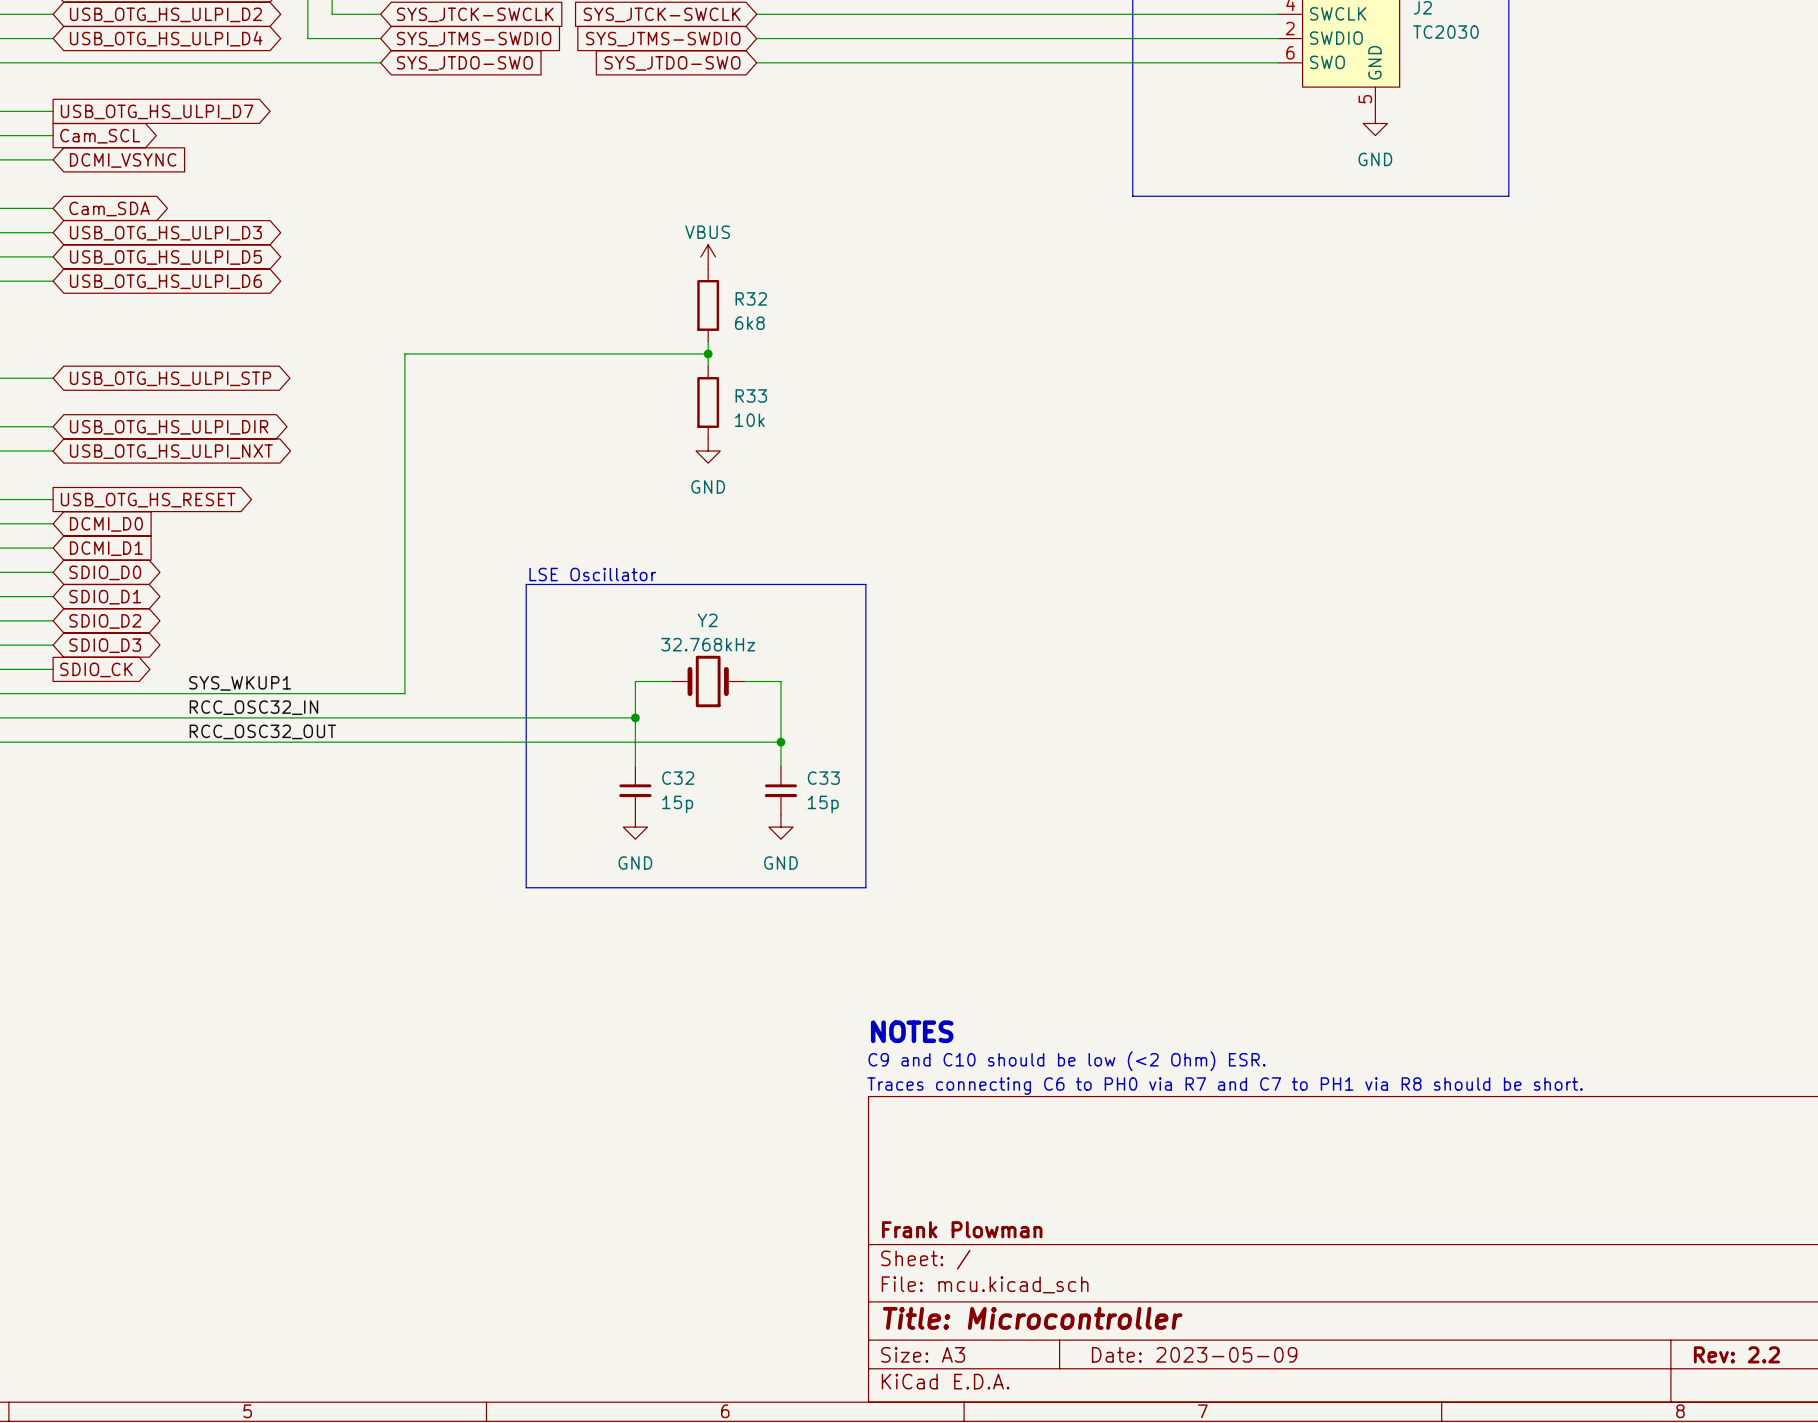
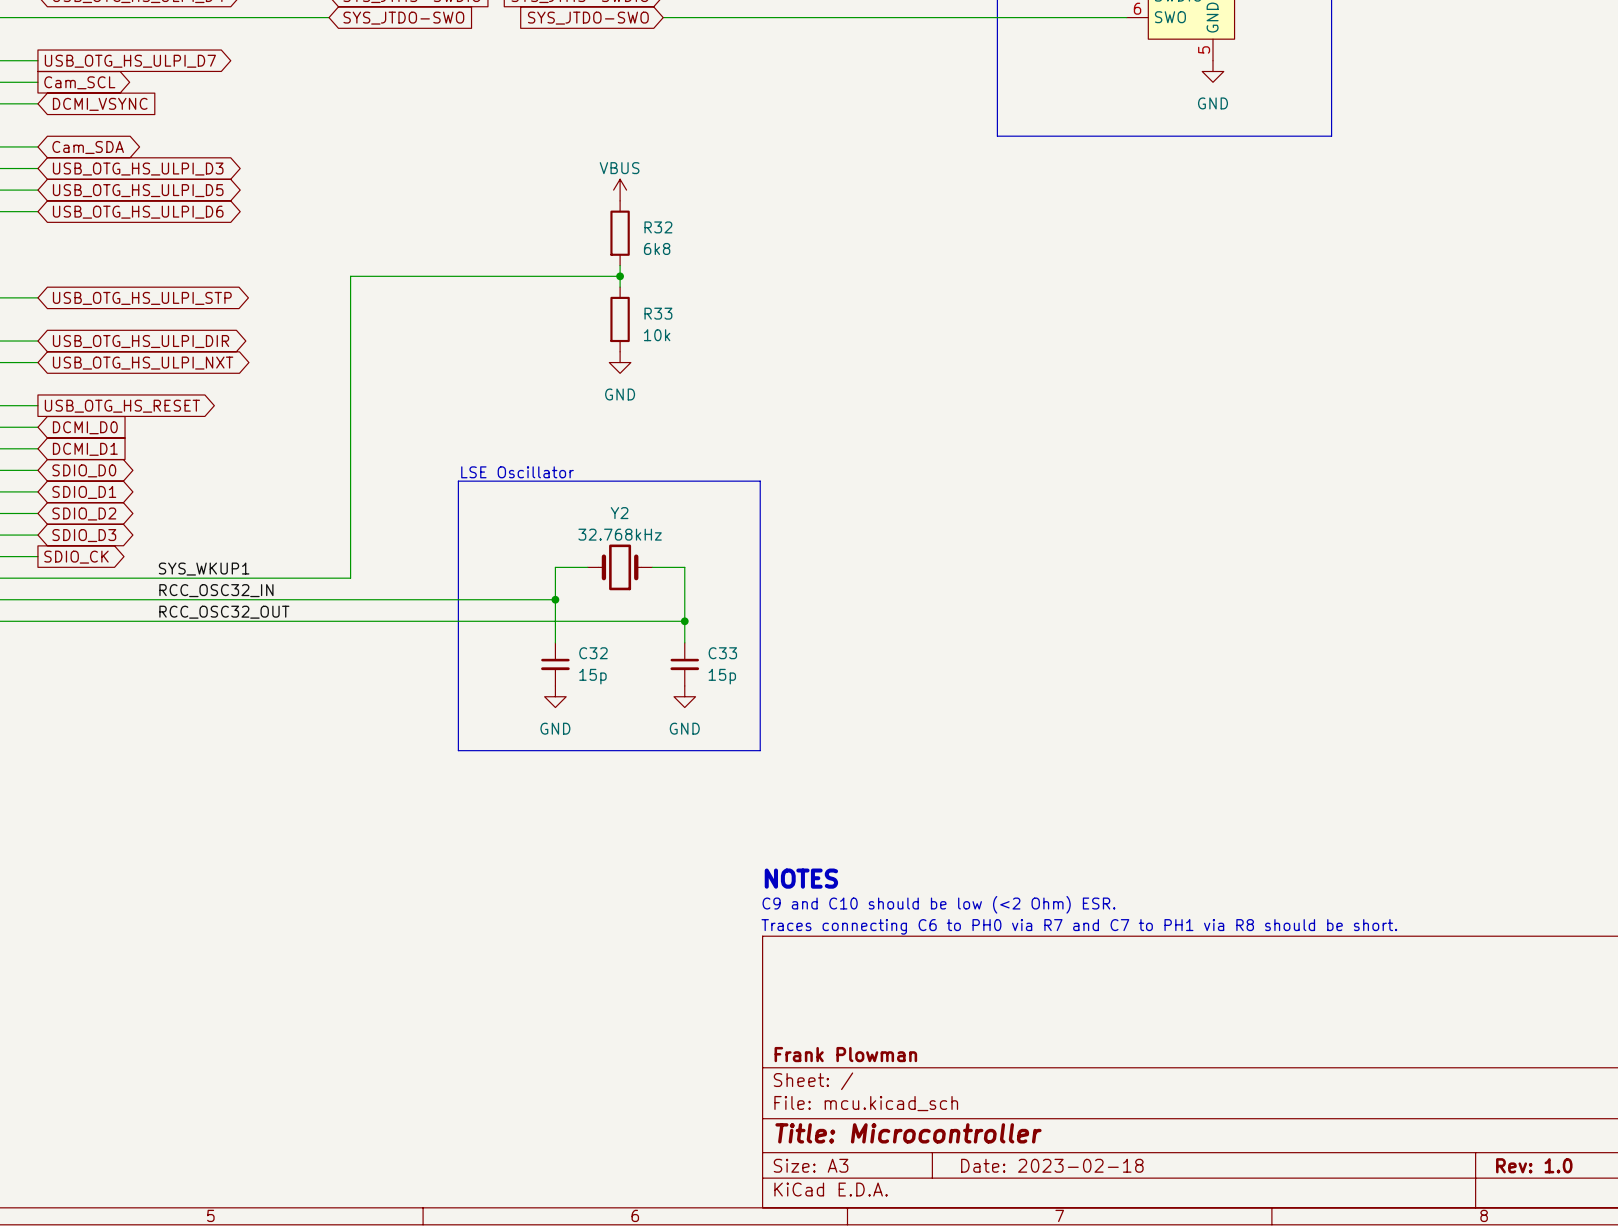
title block: Date: 2023-05-09 (1194, 1354) -> Date: 2023-02-18 (1052, 1165)
title block: Rev: 2.2 (1736, 1354) -> Rev: 1.0 (1534, 1165)

